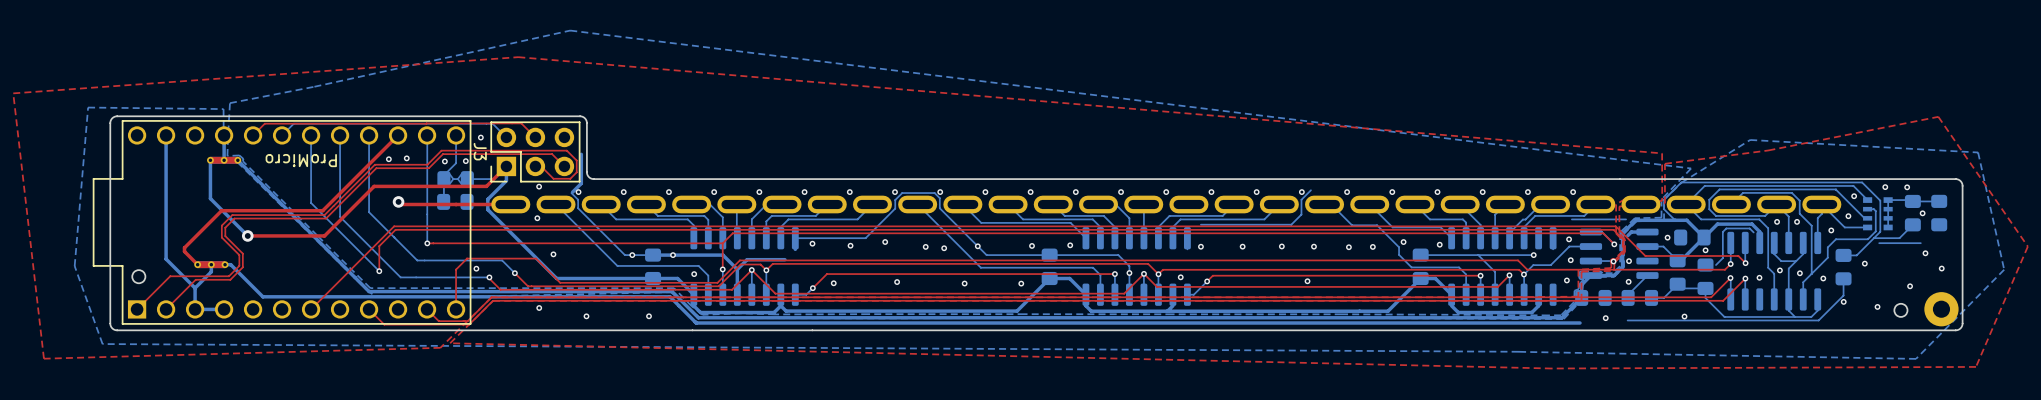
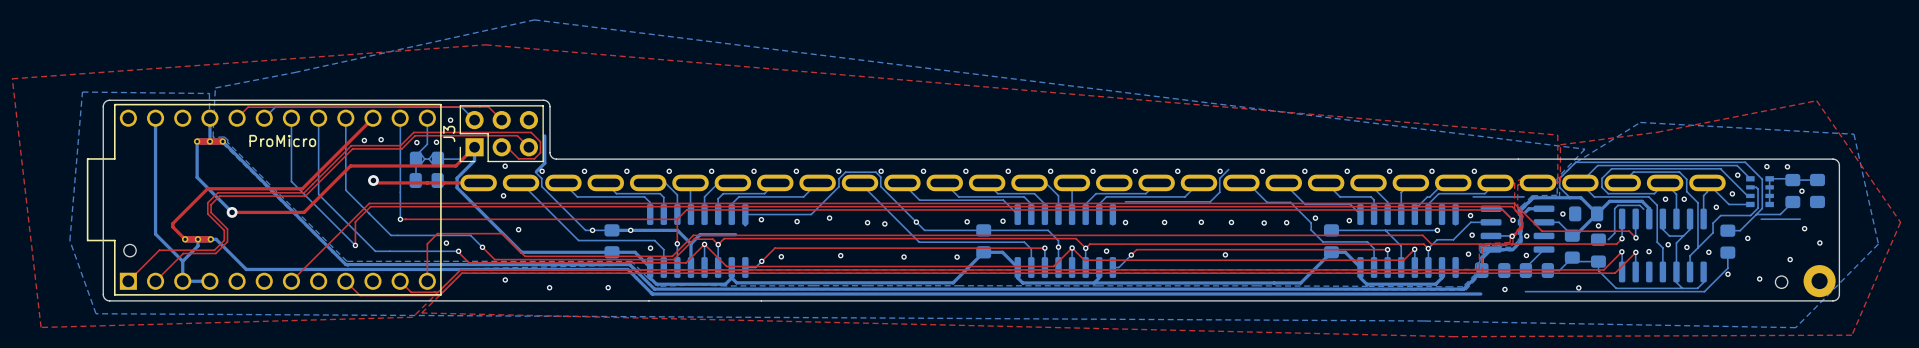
J3 name rotation: 0° (480, 151) -> 180° (449, 133)
part value rotation: 0° (301, 160) -> 180° (282, 140)

